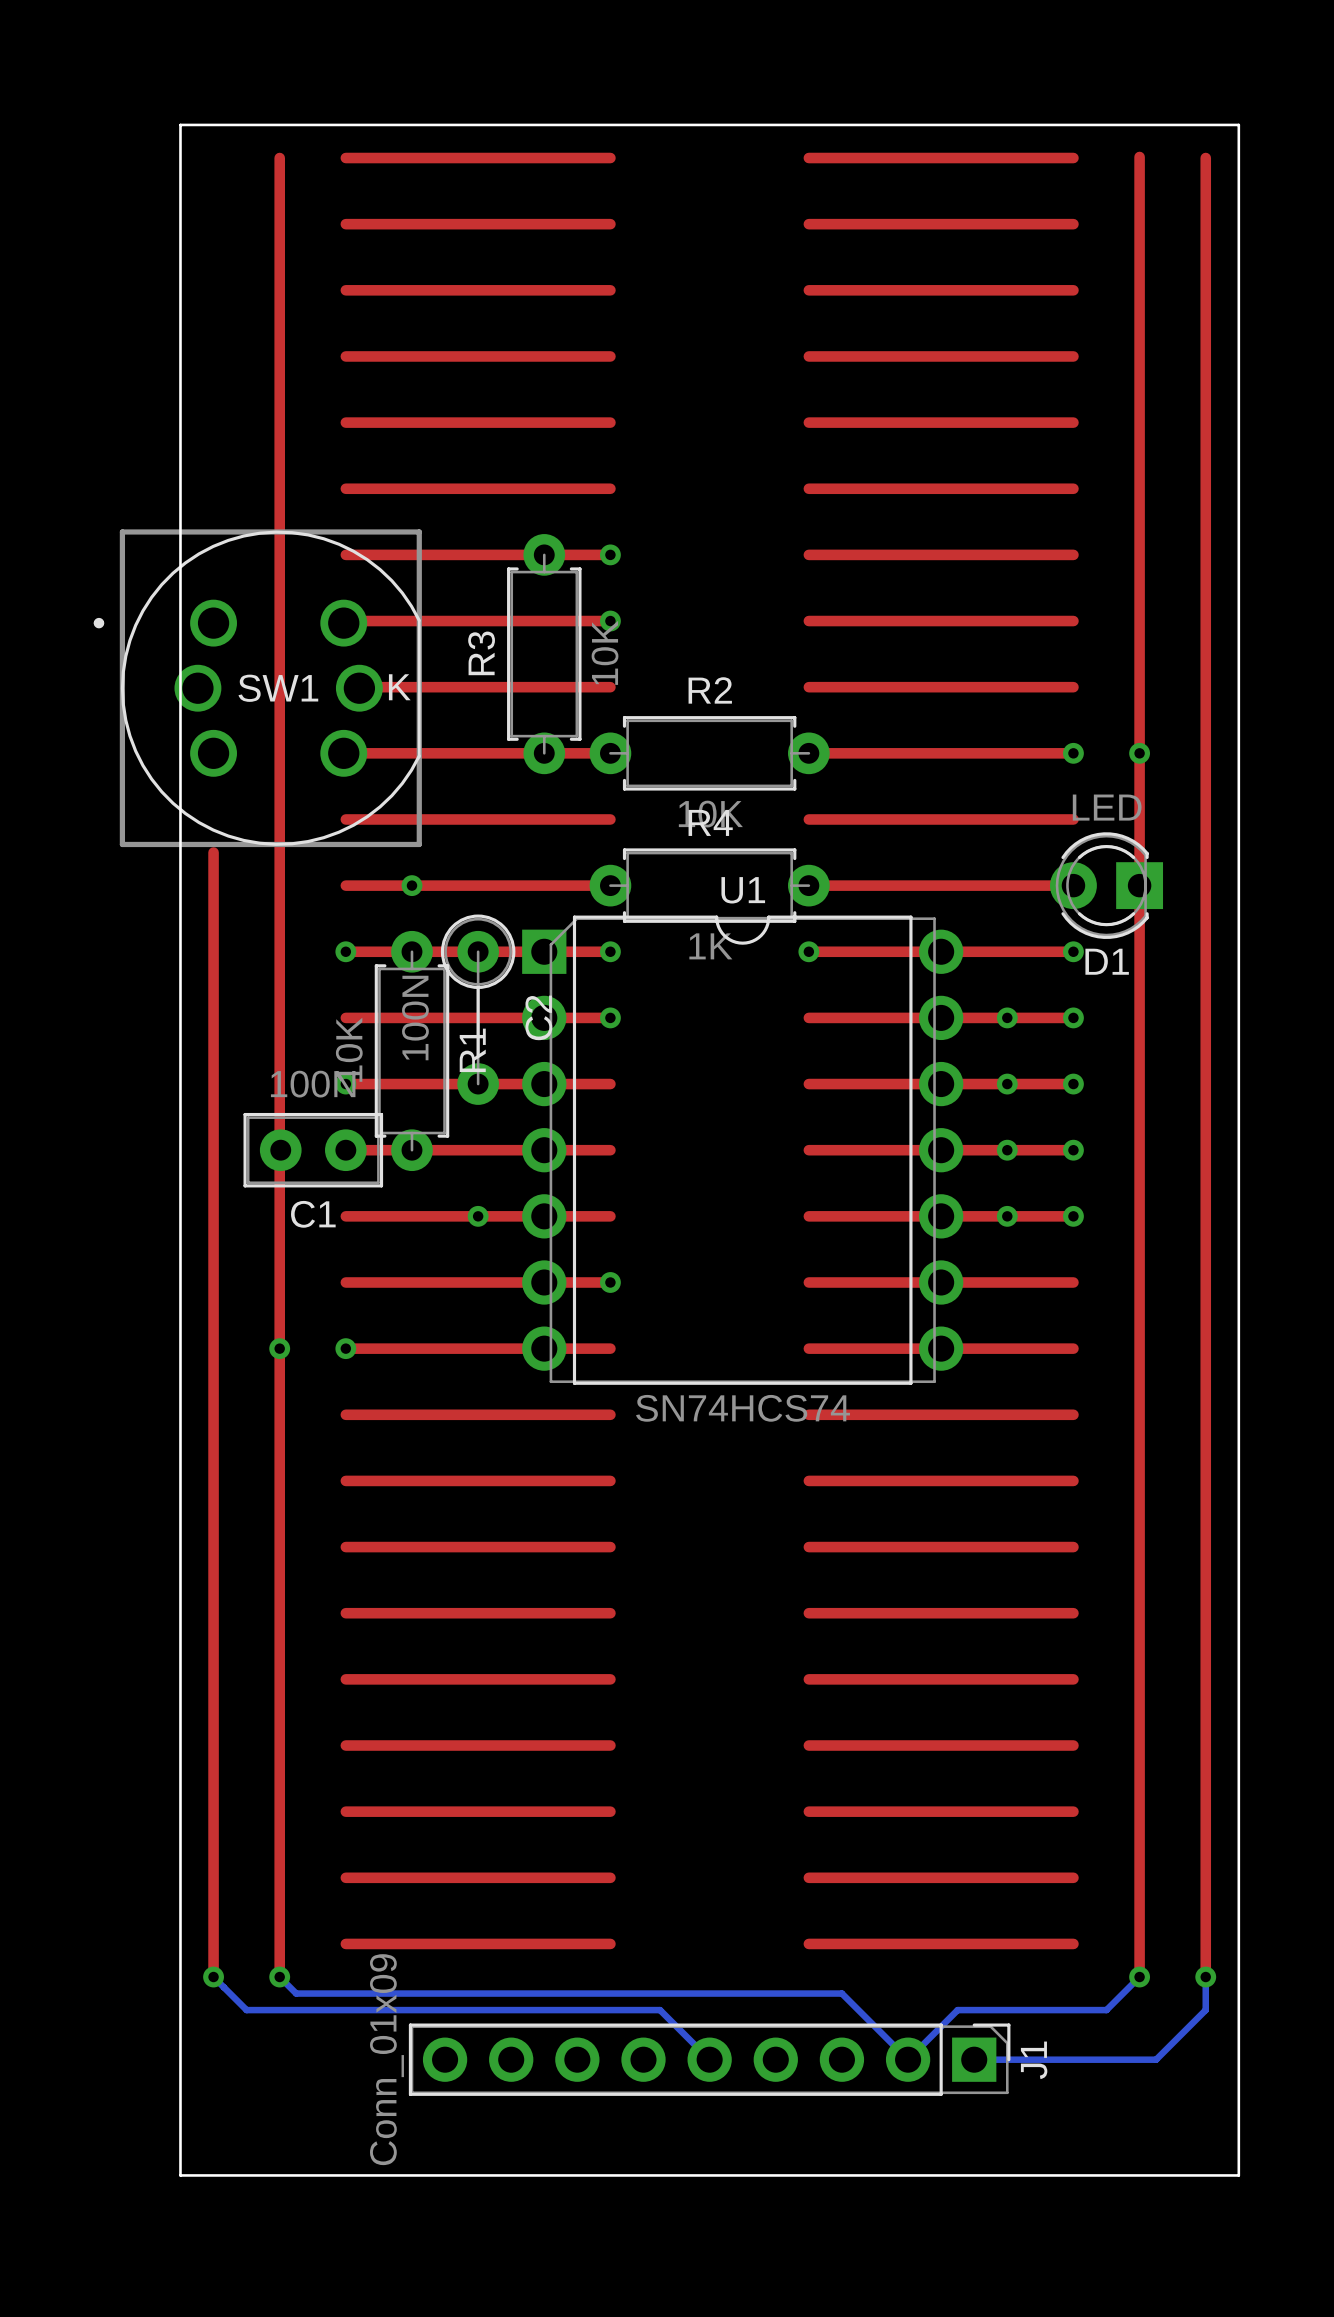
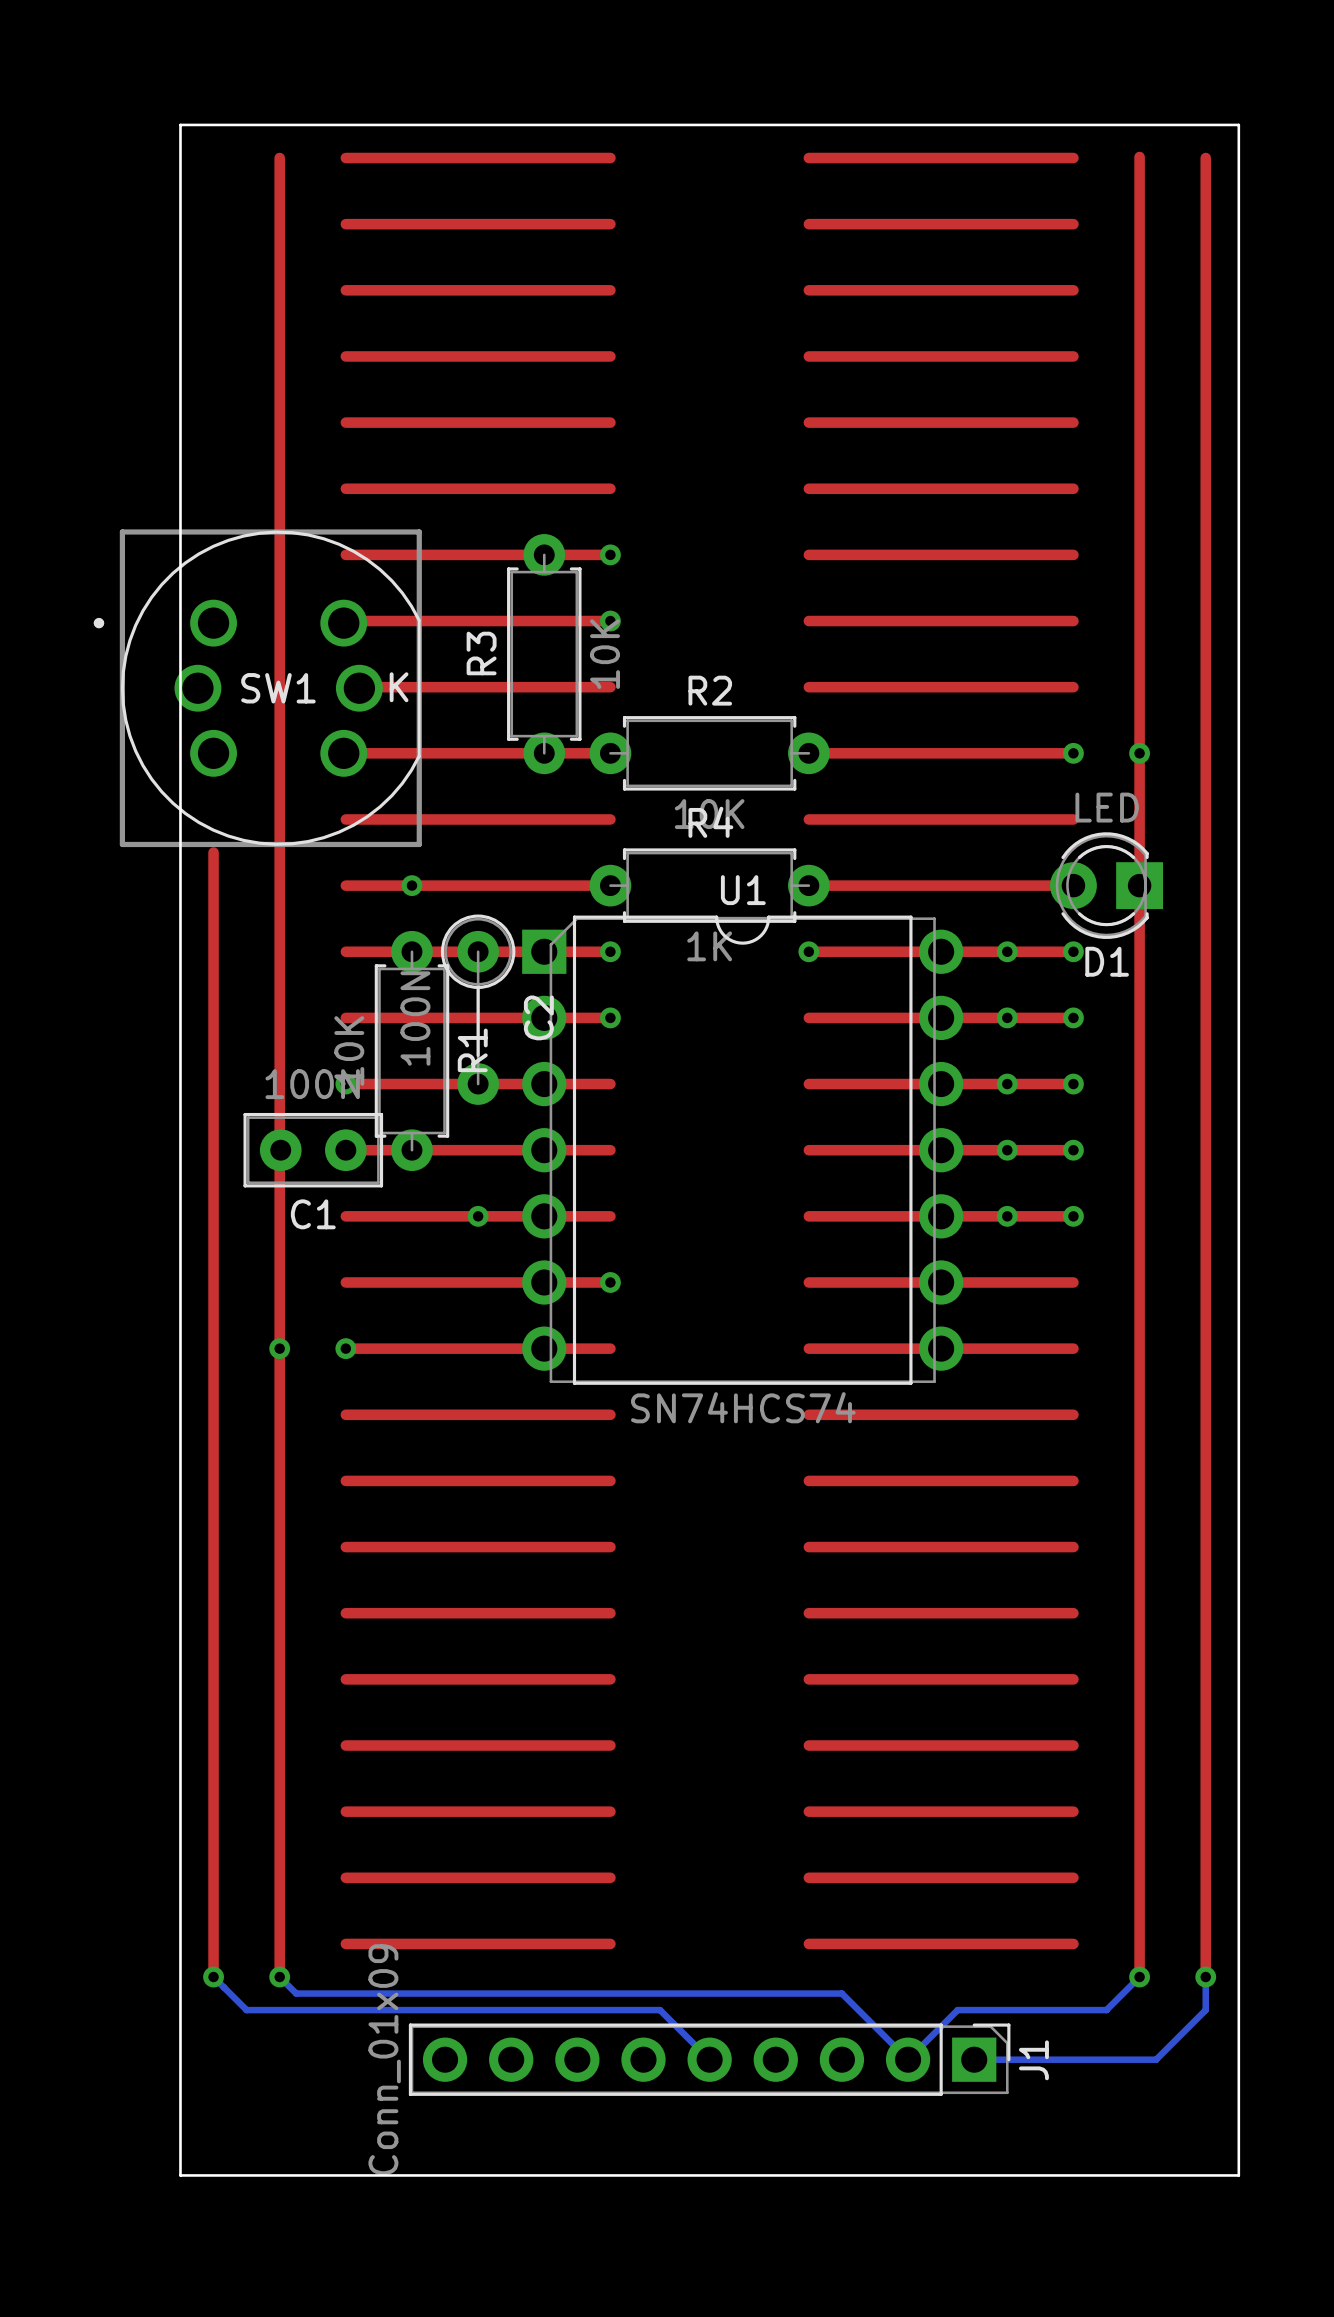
via: (345, 951) -> none
via: none -> (1007, 951)

